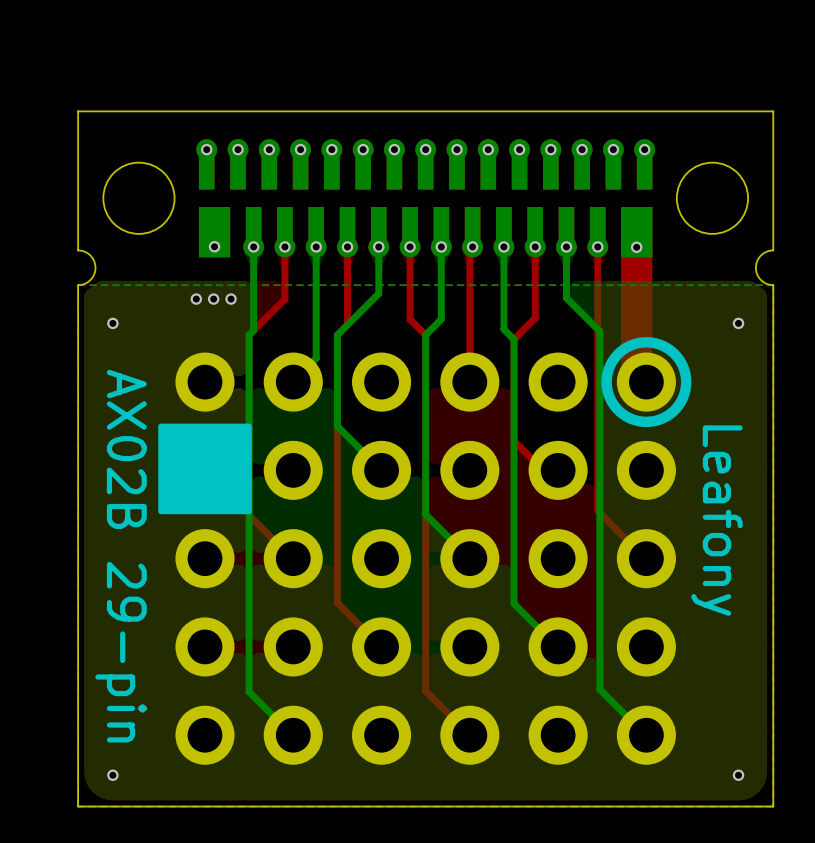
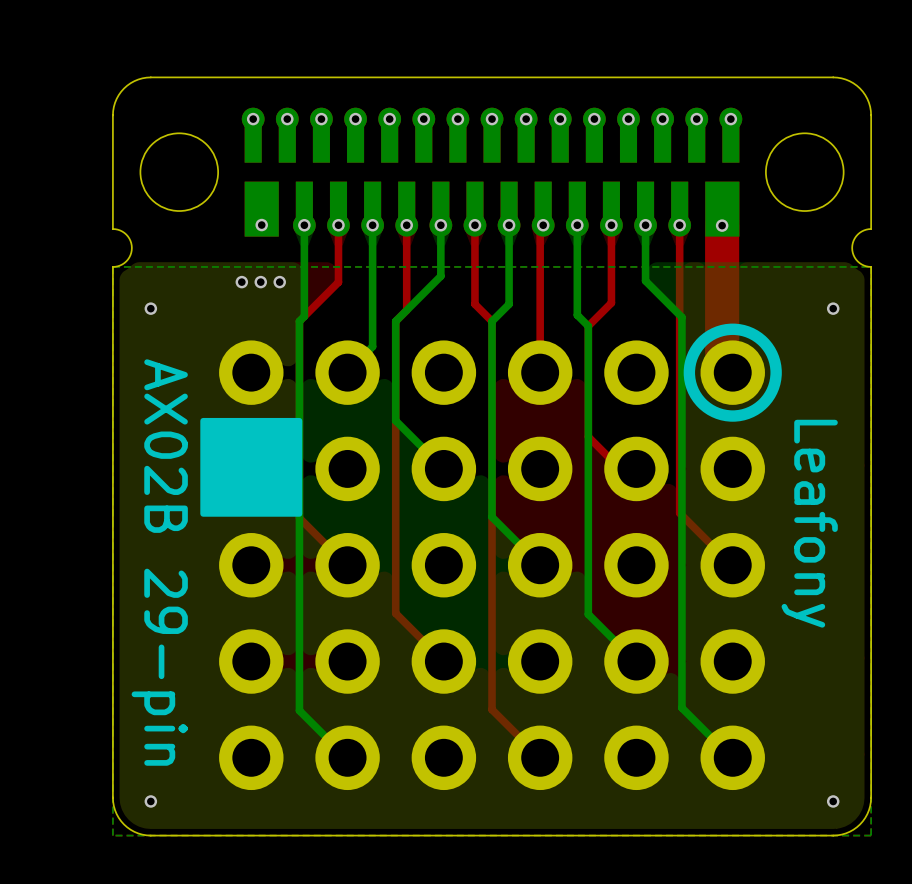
board edge: (112, 111) (78, 111) (78, 146) -> (150, 77) (138, 79) (124, 88) (115, 102) (112, 115)
board edge: (738, 111) (773, 111) (773, 146) -> (833, 77) (849, 81) (860, 88) (867, 98) (871, 115)
board edge: (78, 771) (78, 806) (112, 806) -> (112, 797) (115, 810) (124, 824) (138, 833) (150, 835)
board edge: (773, 771) (773, 806) (738, 806) -> (871, 797) (867, 814) (860, 824) (845, 833) (833, 835)

